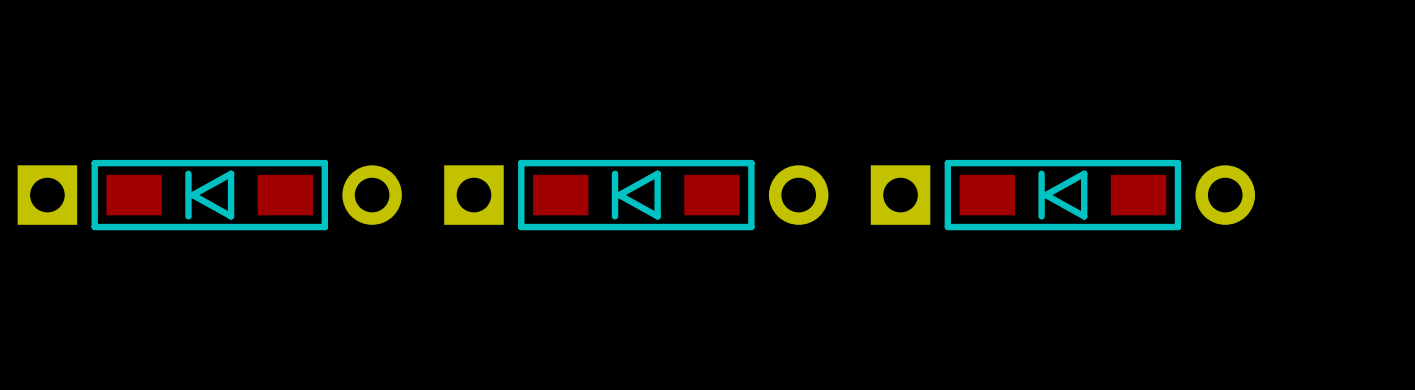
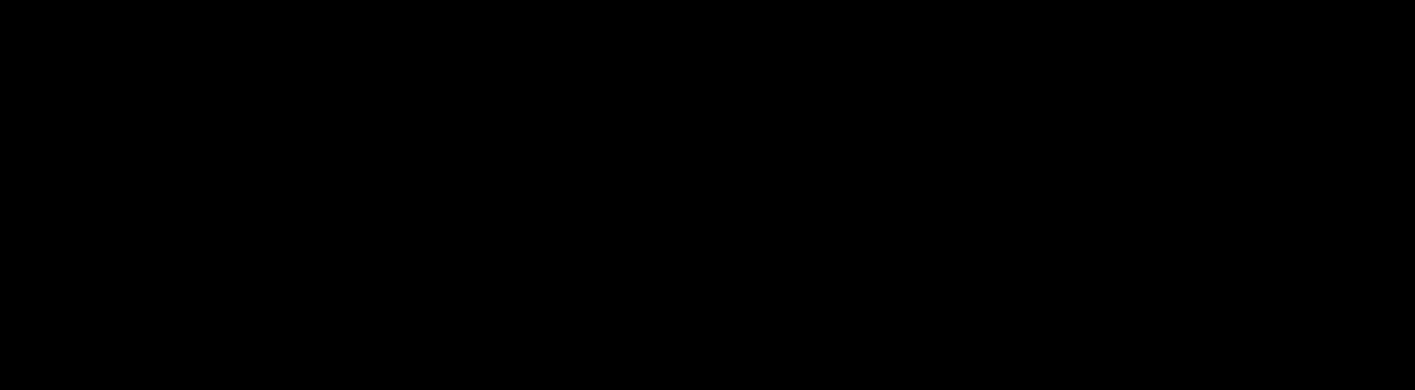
part: (209, 195) -> none
part: (636, 195) -> none
part: (1062, 195) -> none

